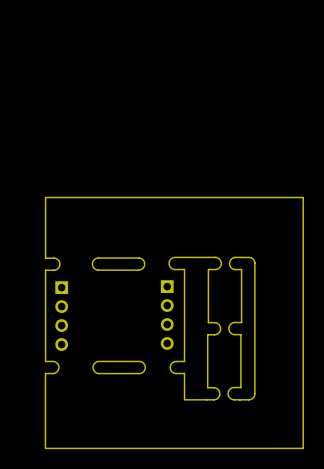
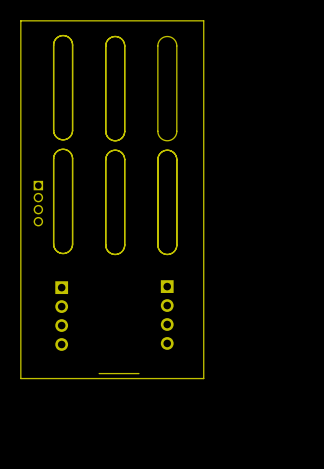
board edge: none -> (203, 20) (20, 20) (20, 378) (203, 378) (203, 20)
board edge: none -> (53, 45) (53, 130)
board edge: none -> (72, 45) (72, 130)
board edge: none -> (72, 45) (69, 37) (63, 35) (56, 38) (53, 45)
board edge: none -> (72, 45) (69, 37) (63, 35) (56, 38) (53, 45)
board edge: none -> (105, 45) (105, 131)
board edge: none -> (124, 45) (124, 131)
board edge: none -> (124, 45) (121, 38) (115, 36) (108, 39) (105, 45)
board edge: none -> (124, 45) (121, 38) (115, 36) (108, 39) (105, 45)
board edge: none -> (176, 45) (176, 132) (173, 138) (166, 140) (160, 137) (157, 132) (157, 44) (161, 38) (167, 36) (173, 38) (176, 45)
board edge: none -> (72, 130) (69, 137) (63, 139) (56, 136) (53, 130)
board edge: none -> (72, 130) (69, 137) (63, 139) (56, 136) (53, 130)
board edge: none -> (124, 131) (121, 138) (115, 140) (108, 137) (105, 131)
board edge: none -> (124, 131) (121, 138) (115, 140) (108, 137) (105, 131)
board edge: none -> (53, 158) (53, 244)
board edge: none -> (72, 158) (72, 244)
board edge: none -> (72, 158) (69, 151) (63, 149) (56, 152) (53, 158)
board edge: none -> (72, 158) (69, 151) (63, 149) (56, 152) (53, 158)
board edge: none -> (105, 159) (105, 244)
board edge: none -> (124, 159) (124, 244)
board edge: none -> (124, 159) (121, 153) (115, 150) (108, 153) (105, 159)
board edge: none -> (124, 159) (121, 153) (115, 150) (108, 153) (105, 159)
board edge: none -> (157, 159) (157, 244)
board edge: none -> (176, 159) (176, 244)
board edge: none -> (176, 159) (174, 153) (167, 150) (160, 153) (157, 159)
board edge: none -> (176, 159) (174, 153) (167, 150) (160, 153) (157, 159)
board edge: (45, 197) (45, 258) (56, 258) (59, 264) (56, 269) (45, 270) (45, 361) -> none
board edge: (45, 197) (303, 197) (303, 448) -> none
part: none -> (38, 203)
board edge: none -> (72, 244) (69, 251) (63, 253) (56, 250) (53, 244)
board edge: none -> (72, 244) (69, 251) (63, 253) (56, 250) (53, 244)
board edge: none -> (124, 244) (121, 252) (115, 254) (108, 251) (105, 244)
board edge: none -> (124, 244) (121, 252) (115, 254) (108, 251) (105, 244)
board edge: none -> (176, 244) (173, 252) (167, 254) (160, 251) (157, 244)
board edge: none -> (176, 244) (173, 252) (167, 254) (160, 251) (157, 244)
board edge: (175, 257) (216, 257) (220, 261) (218, 268) (208, 269) (208, 322) (217, 323) (220, 329) (216, 334) (207, 334) -> none
board edge: (175, 257) (169, 261) (170, 267) (174, 269) (184, 269) (184, 361) (173, 361) (170, 368) (173, 373) (184, 373) (184, 399) -> none
board edge: (248, 257) (234, 257) (229, 262) (232, 268) (241, 269) (241, 322) -> none
board edge: (248, 257) (253, 259) (254, 263) -> none
board edge: (98, 258) (140, 258) (144, 264) (138, 270) -> none
board edge: (98, 258) (94, 259) (92, 264) (94, 268) (98, 270) -> none
board edge: (254, 262) (254, 393) -> none
board edge: (138, 270) (98, 270) -> none
board edge: (241, 322) (232, 322) (228, 328) (232, 334) (240, 334) -> none
board edge: (207, 334) (207, 387) (213, 387) -> none
board edge: (240, 334) (240, 387) (232, 387) (228, 392) (229, 397) (234, 399) -> none
board edge: (45, 361) (55, 361) (58, 367) (55, 373) (45, 373) (45, 448) -> none
board edge: (99, 361) (140, 361) (145, 368) (139, 373) -> none
board edge: (99, 361) (94, 363) (93, 367) (94, 371) (99, 373) -> none
board edge: (213, 387) (219, 392) (216, 399) (184, 399) -> none
board edge: (254, 393) (250, 399) (234, 399) -> none
board edge: (303, 448) (45, 448) -> none

